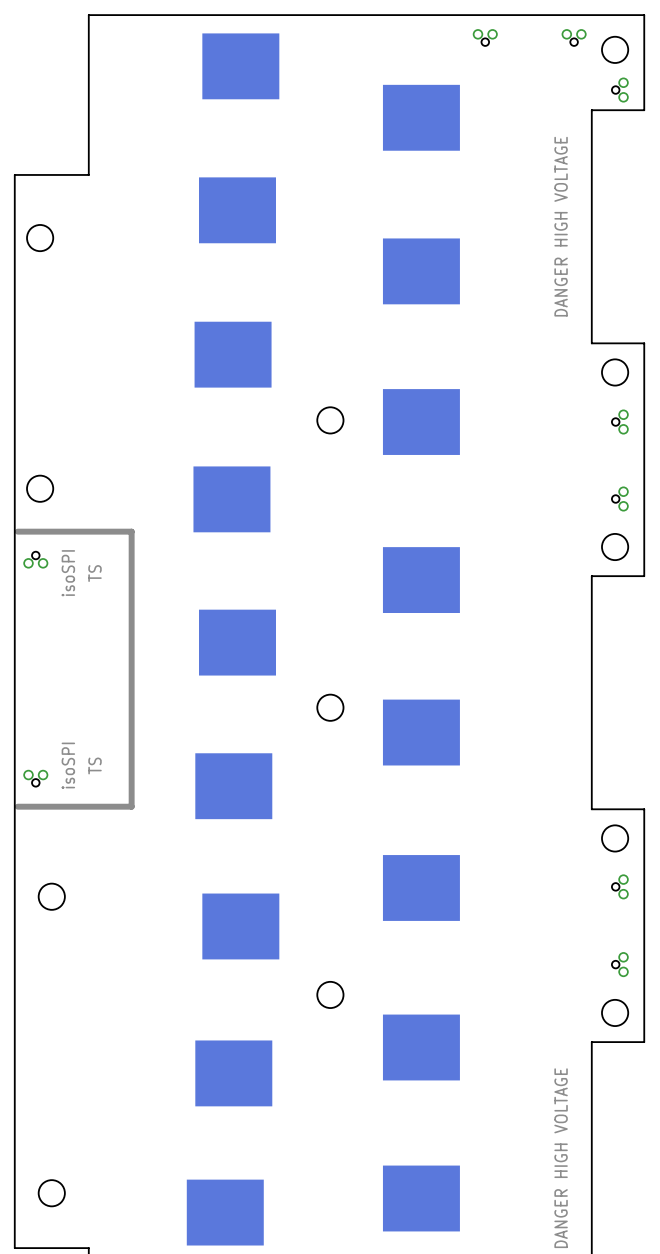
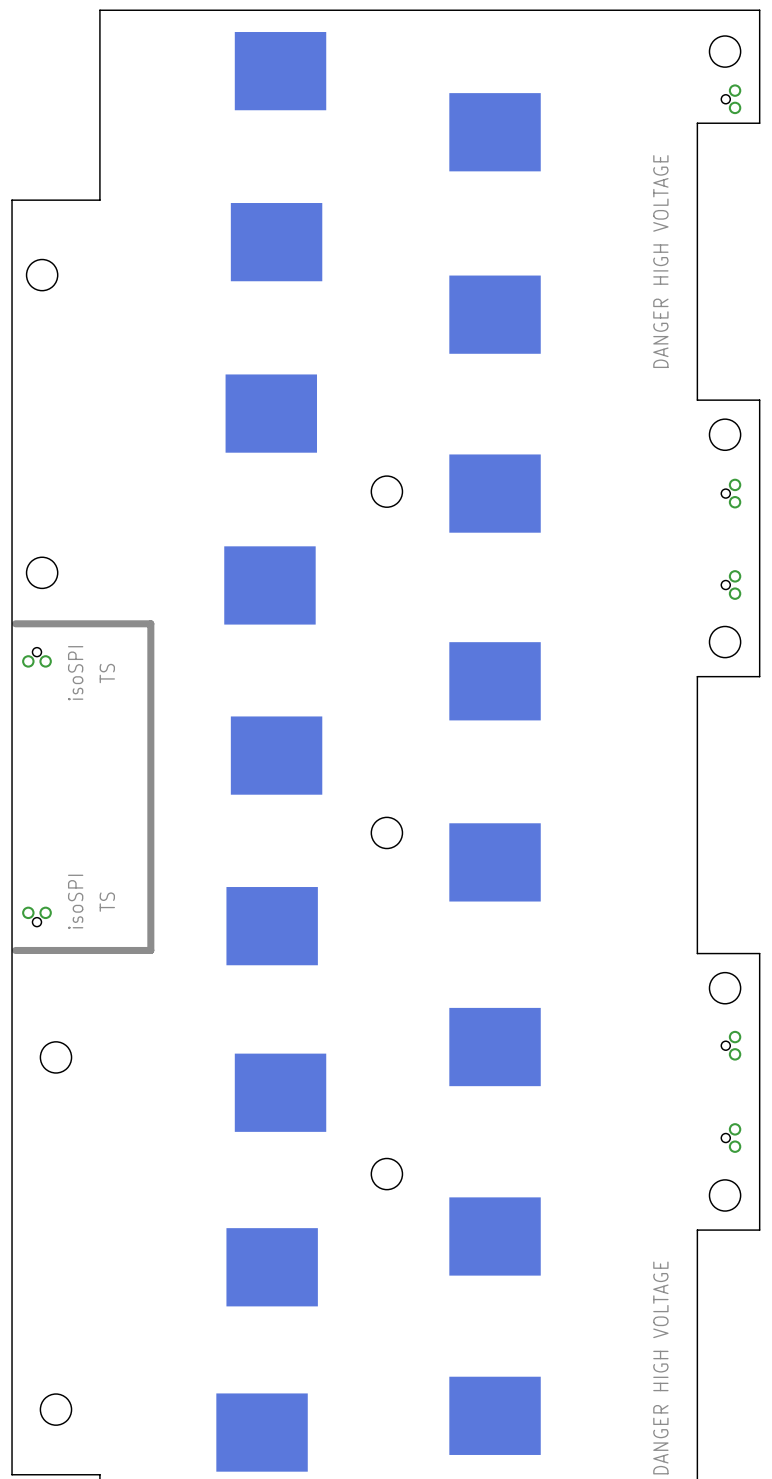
part: (485, 37) -> none
part: (574, 37) -> none

